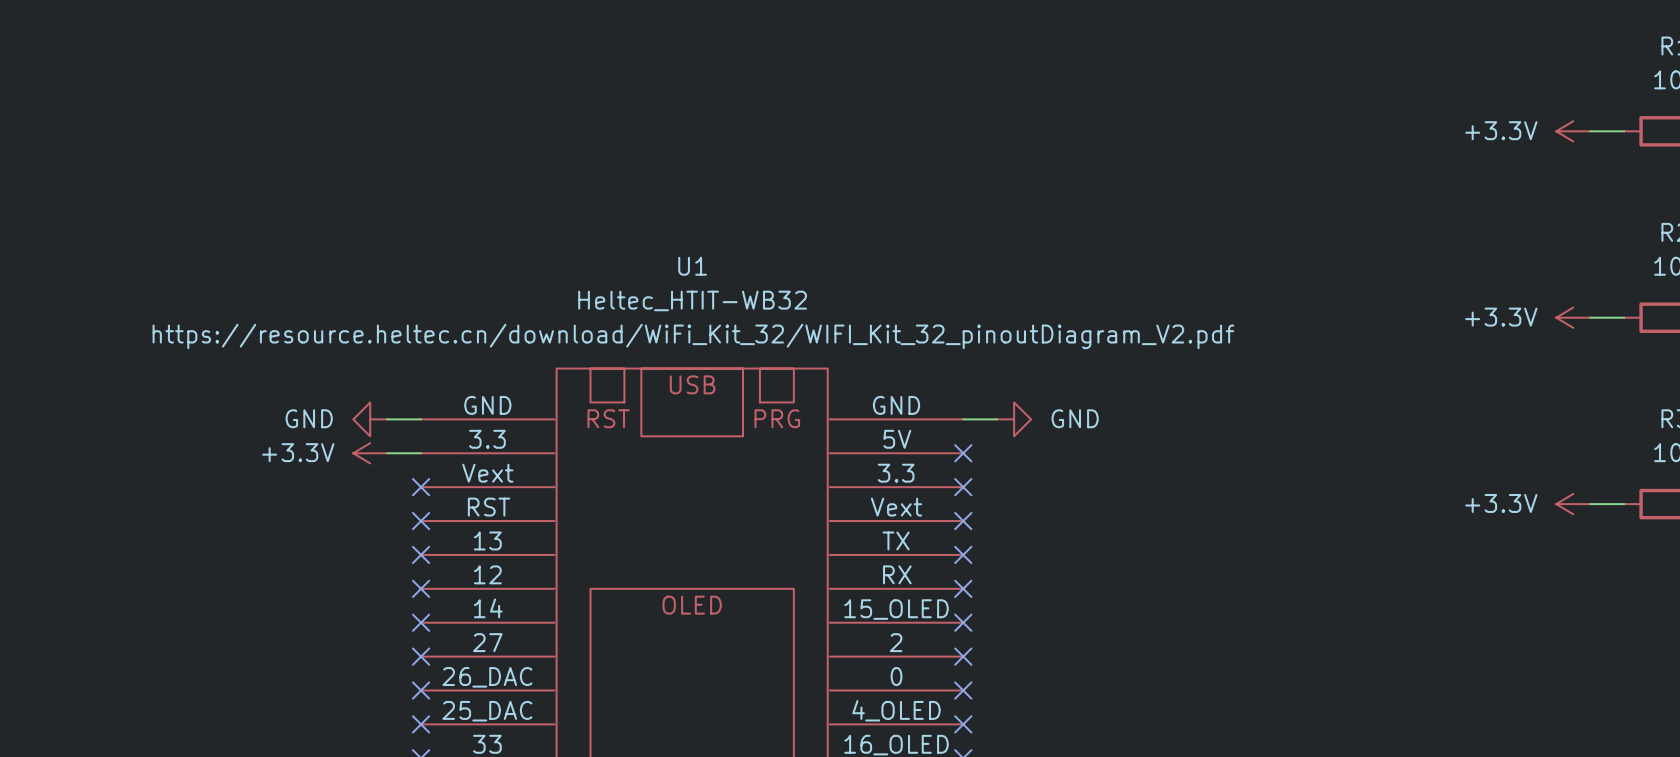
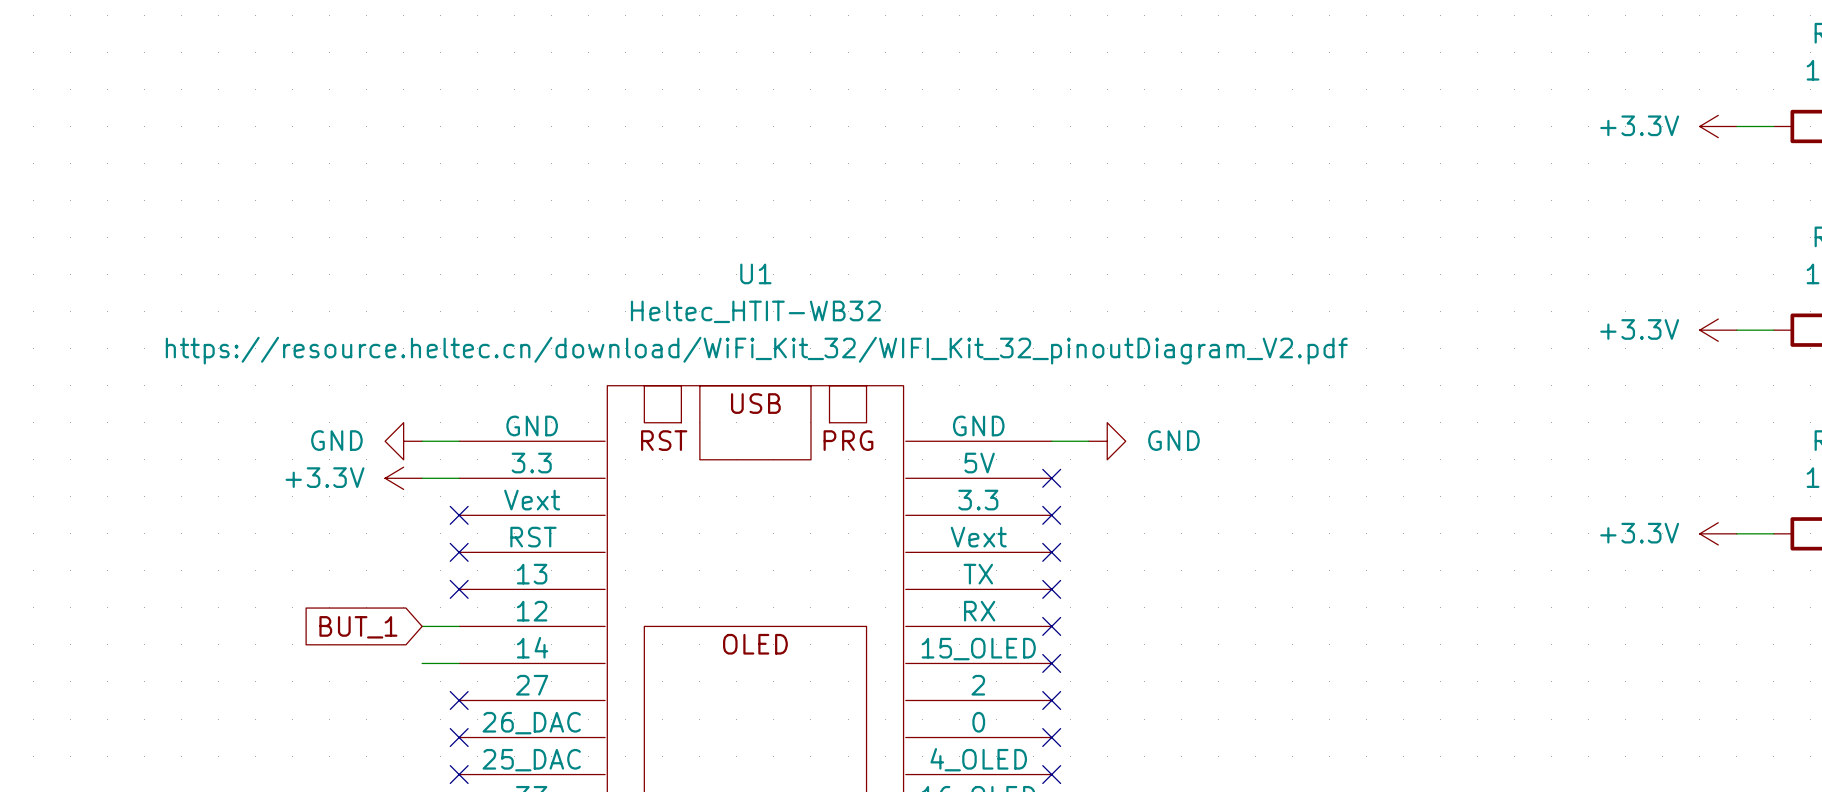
wire: none -> (422, 626) (459, 626)
no-connect mark: (421, 588) -> none
global label: none -> BUT_1 (358, 627)
wire: none -> (422, 663) (459, 663)
no-connect mark: (421, 622) -> none

